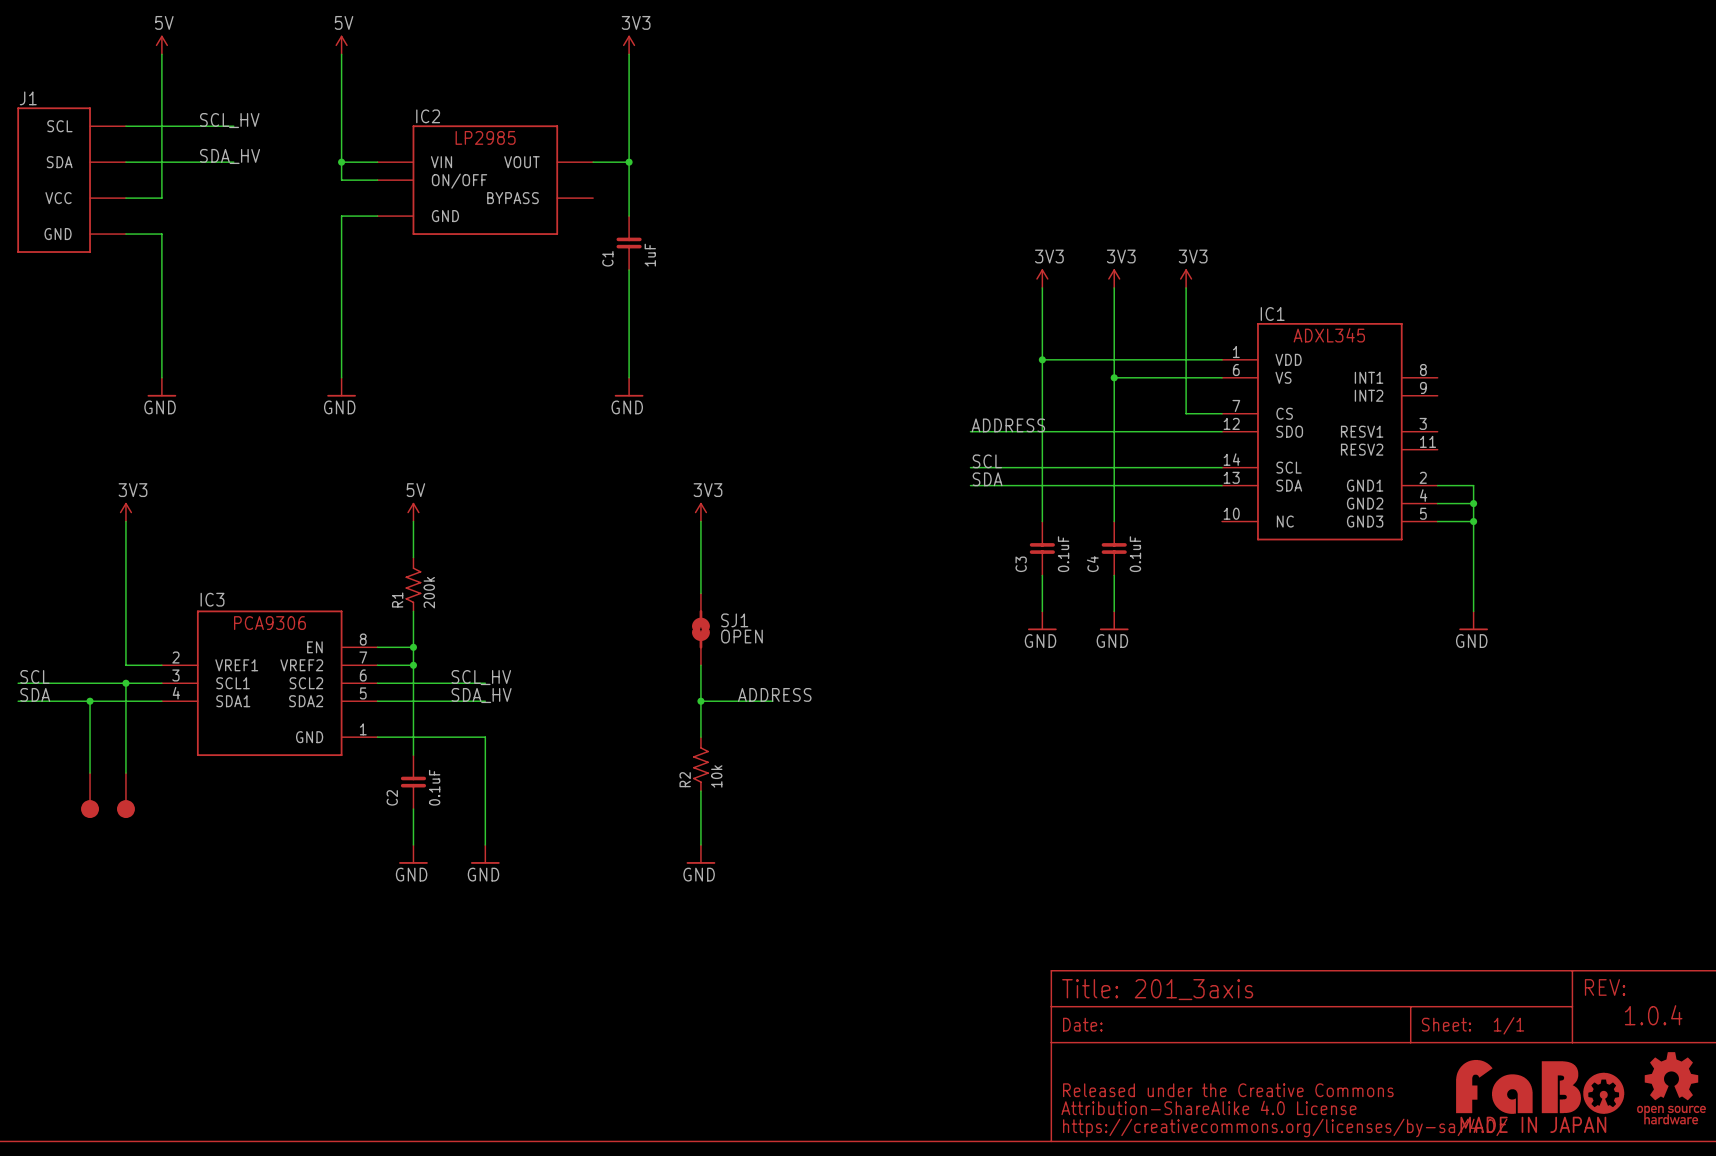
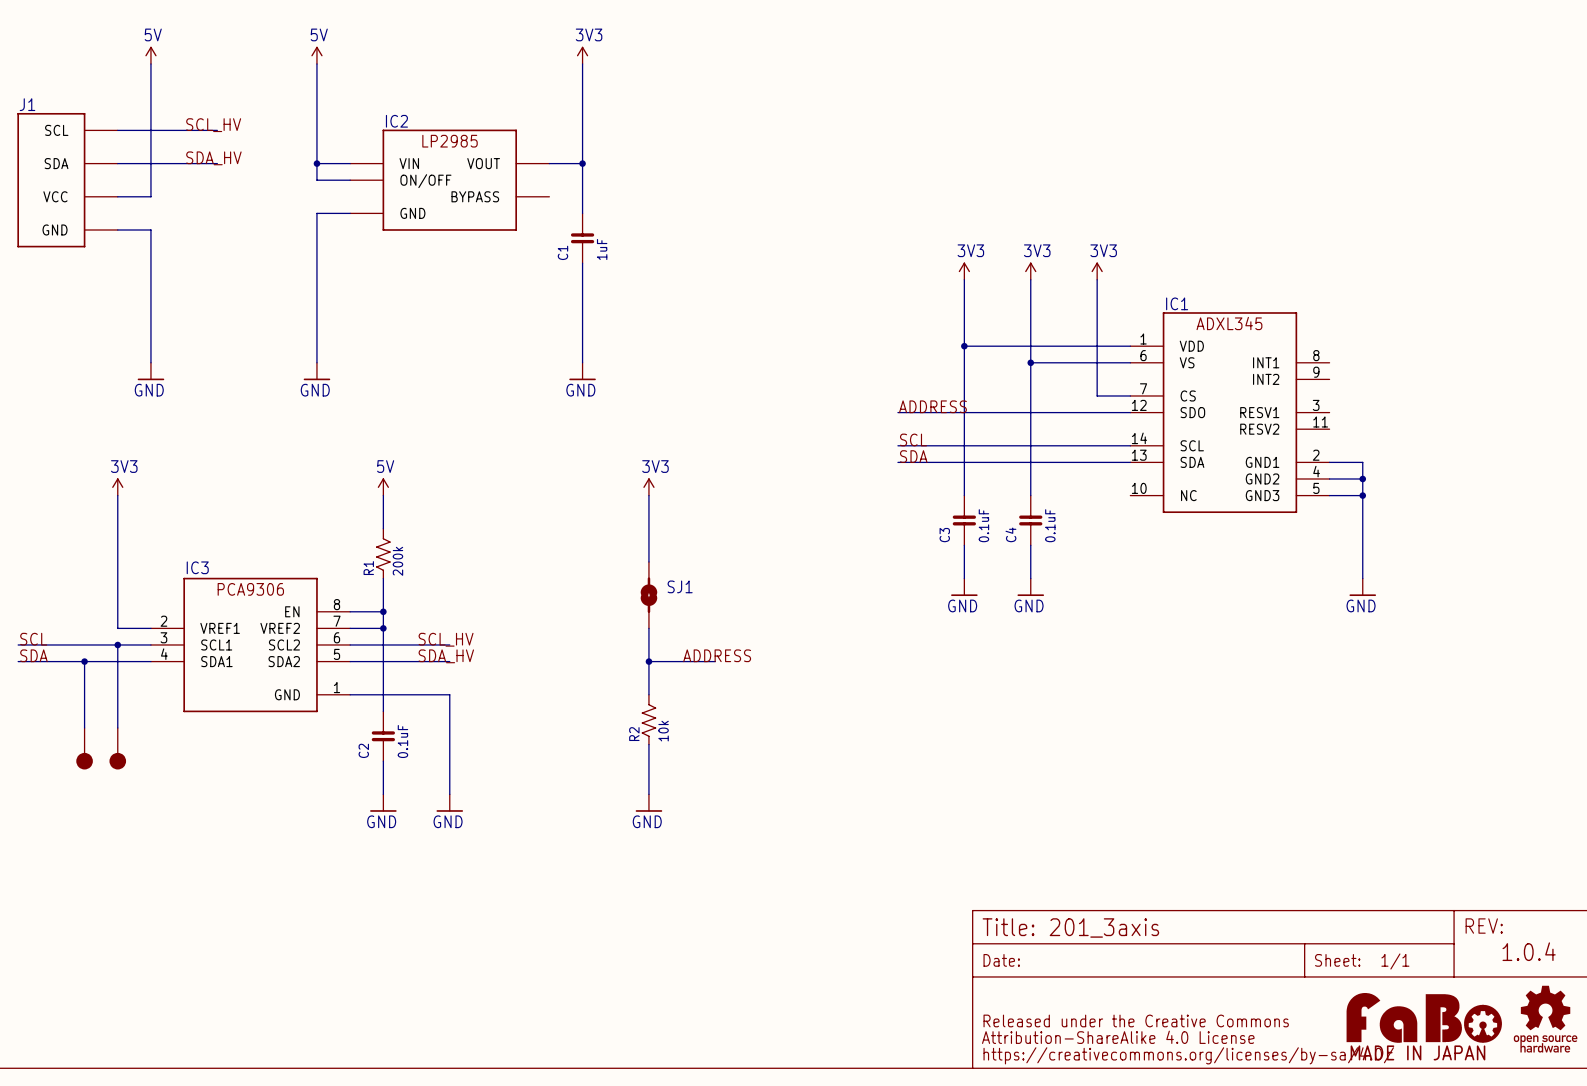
SJ1 value: OPEN (741, 636) -> none

